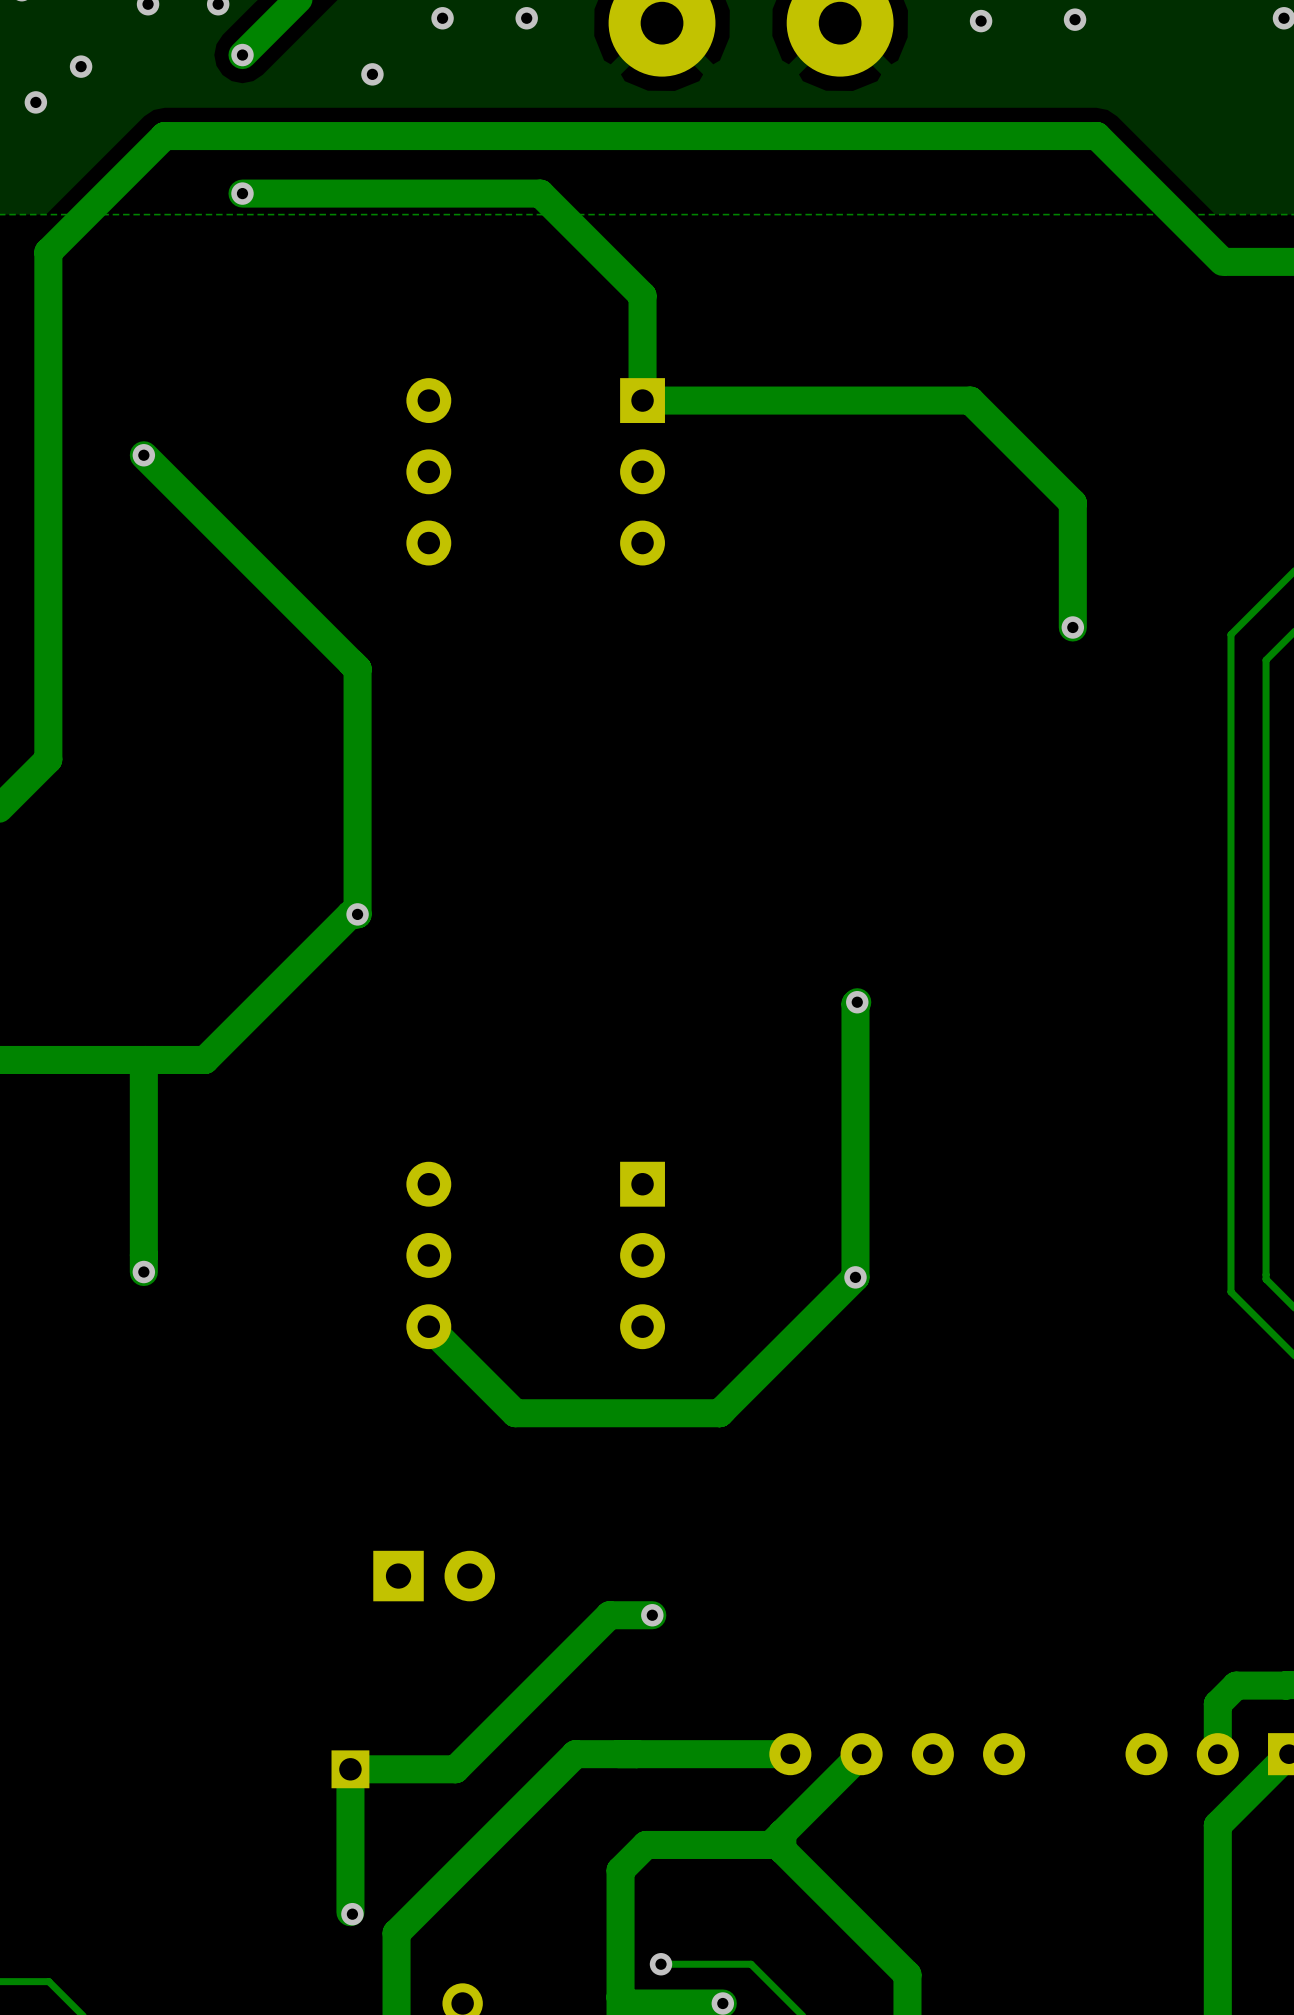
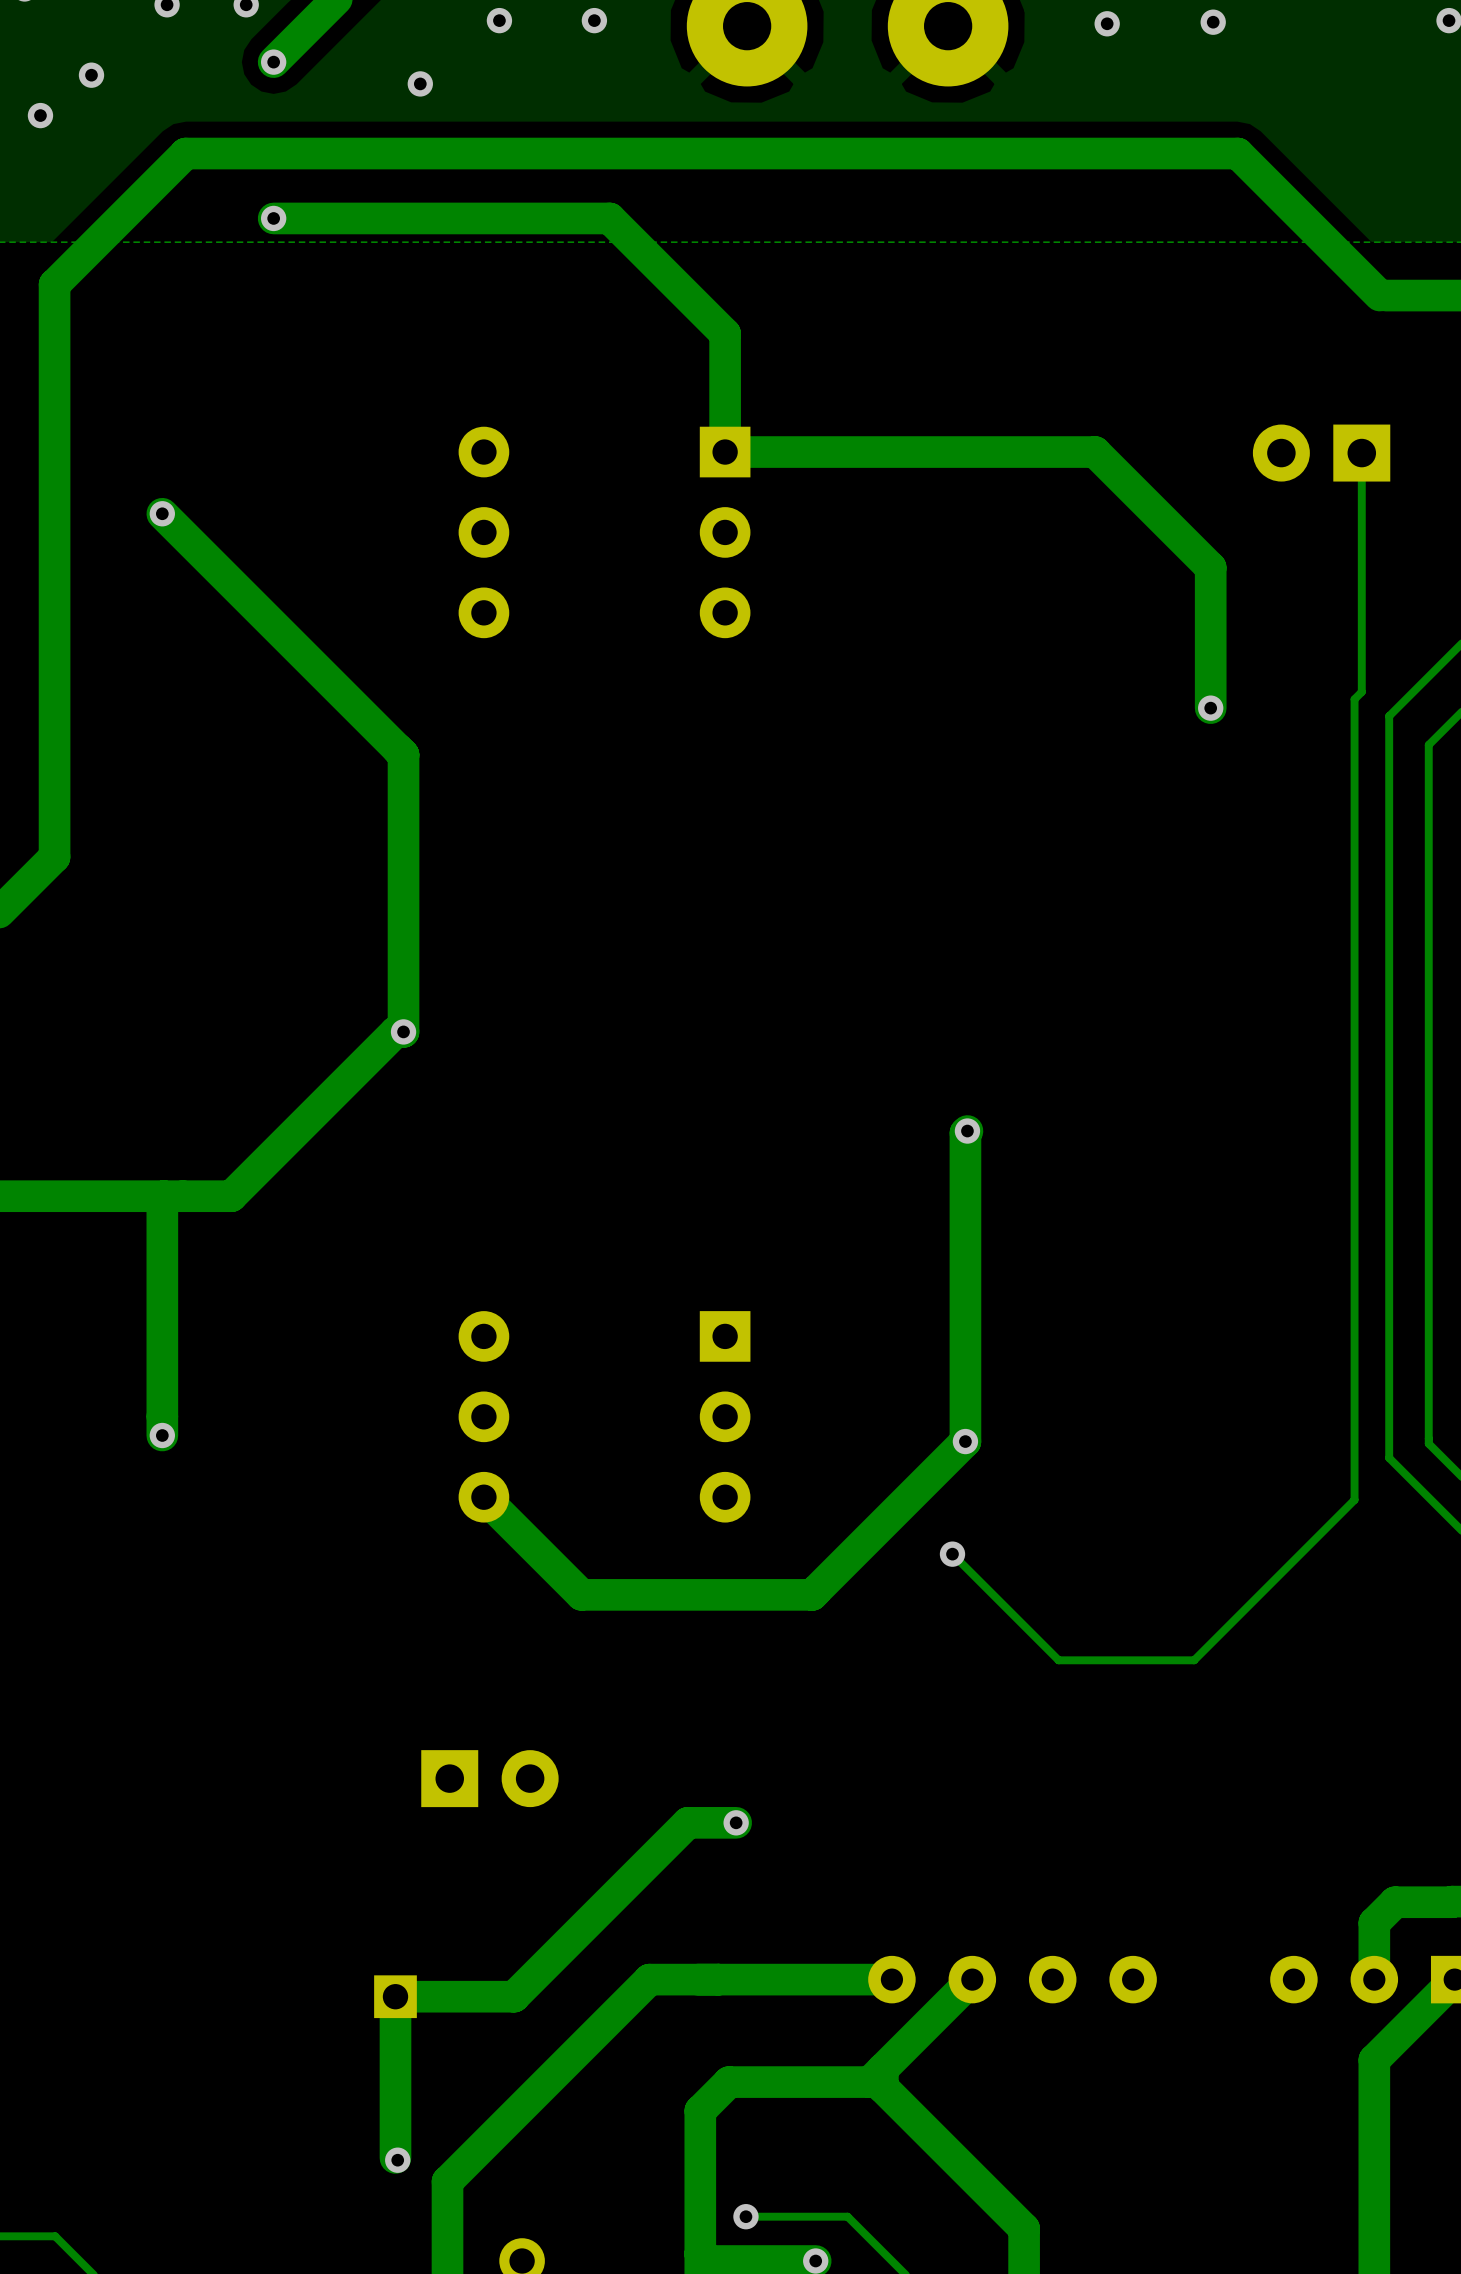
part: none -> (1321, 453)
track: none -> (1361, 453) (1361, 692) (1354, 699) (1354, 1499) (1194, 1660) (1058, 1660) (952, 1554)
via: none -> (952, 1554)

